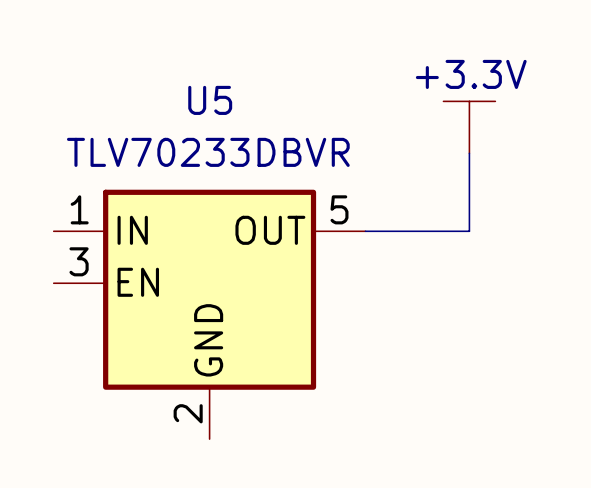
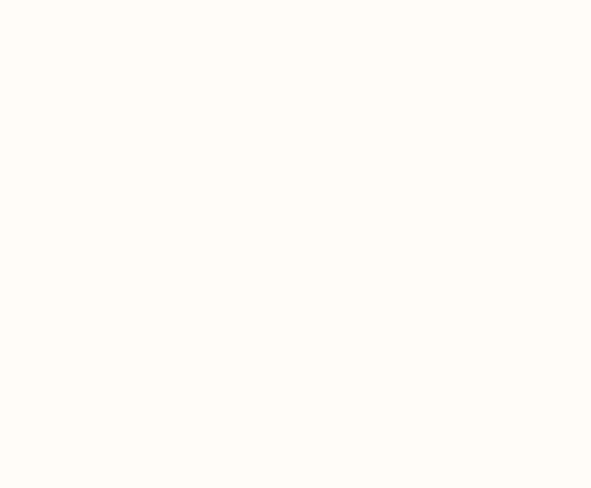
power symbol: +3.3V (469, 127) -> none
wire: (469, 153) (469, 231) (365, 231) -> none
U5: TLV70233DBVR (209, 314) -> none

